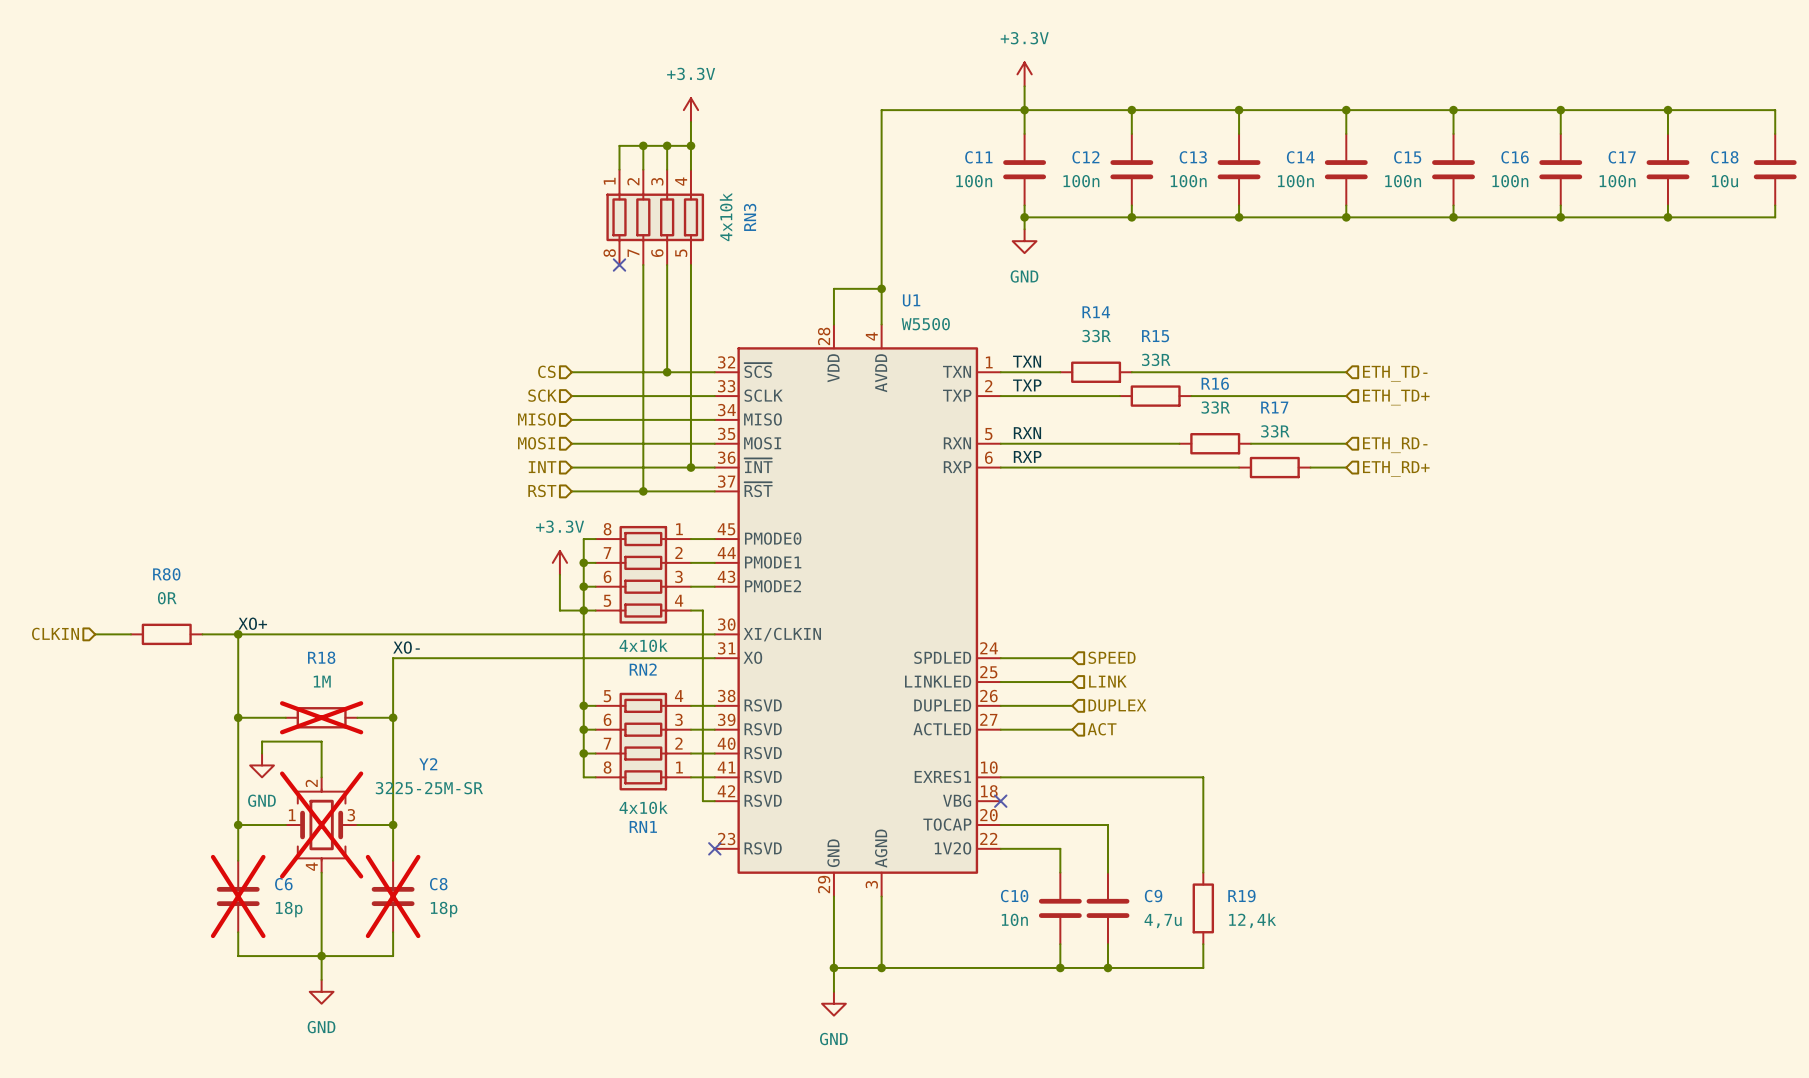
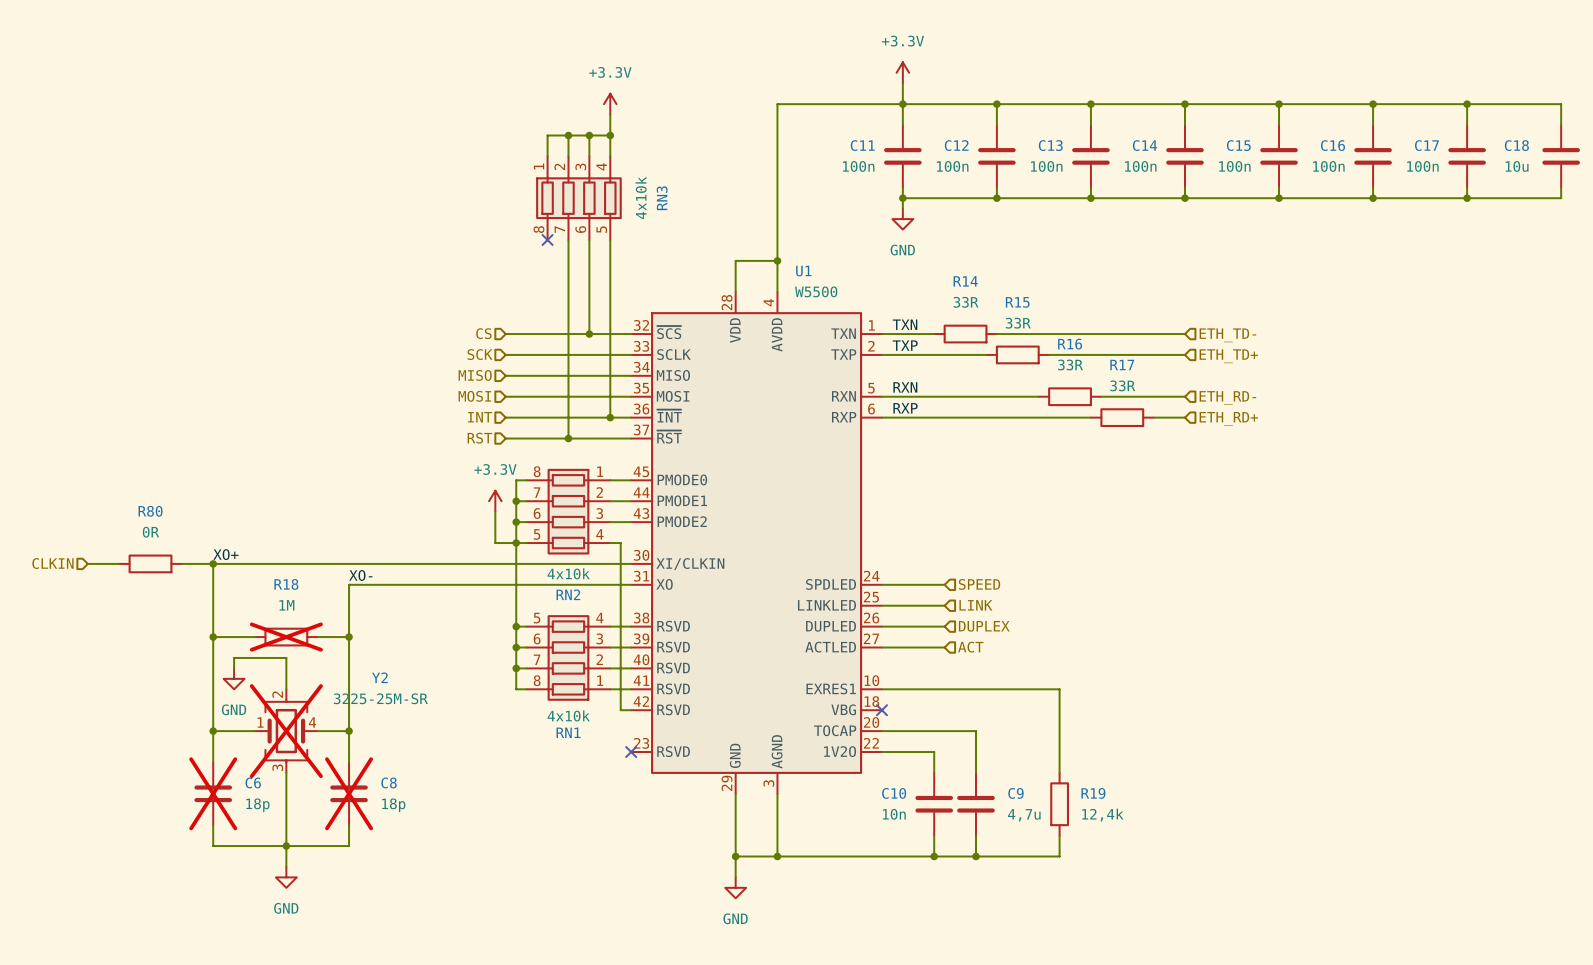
Y2 pin number: 3 (351, 815) -> 4 (312, 722)
Y2 pin number: 4 (311, 866) -> 3 (277, 767)

